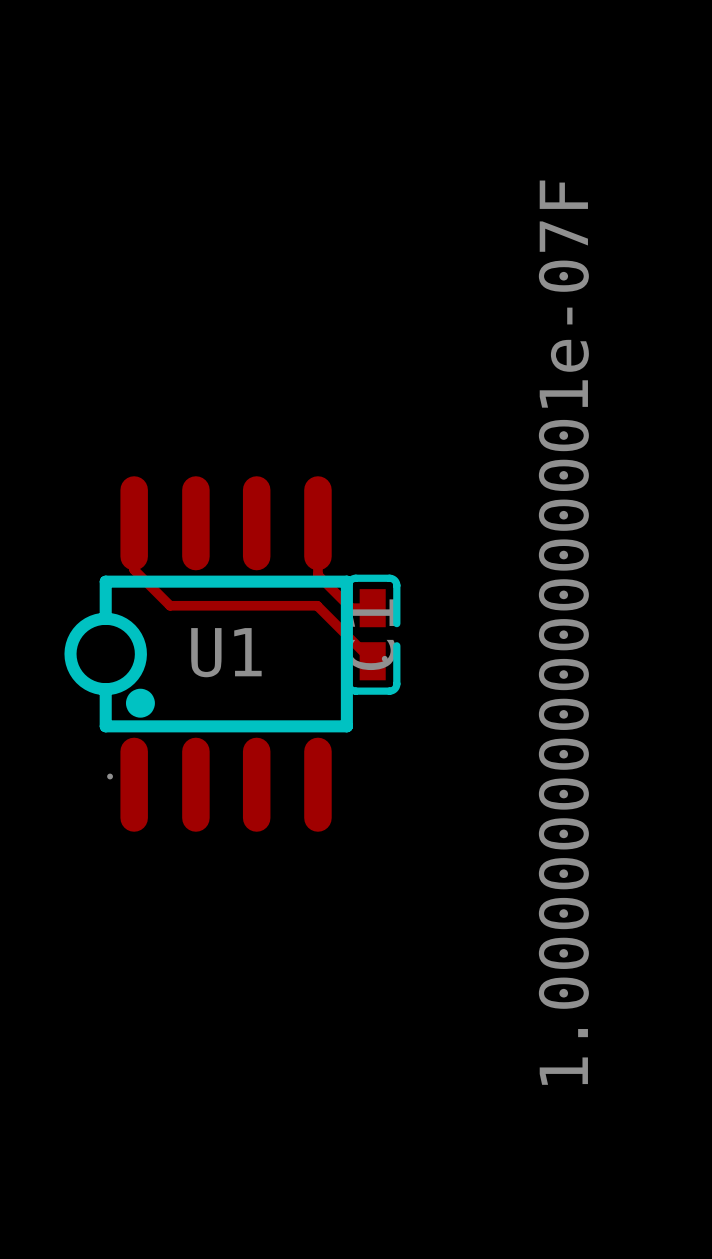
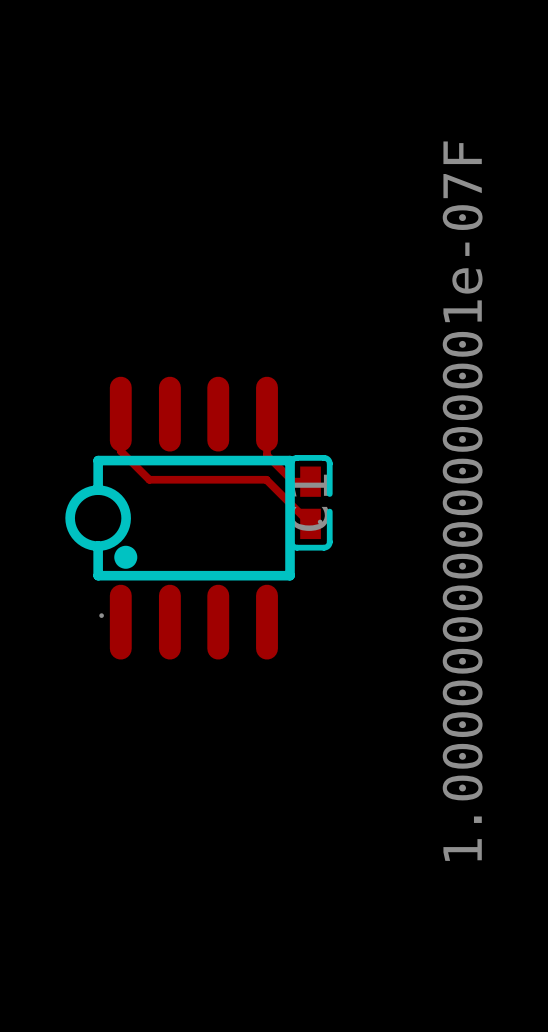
U1 name: U1 (226, 652) -> none

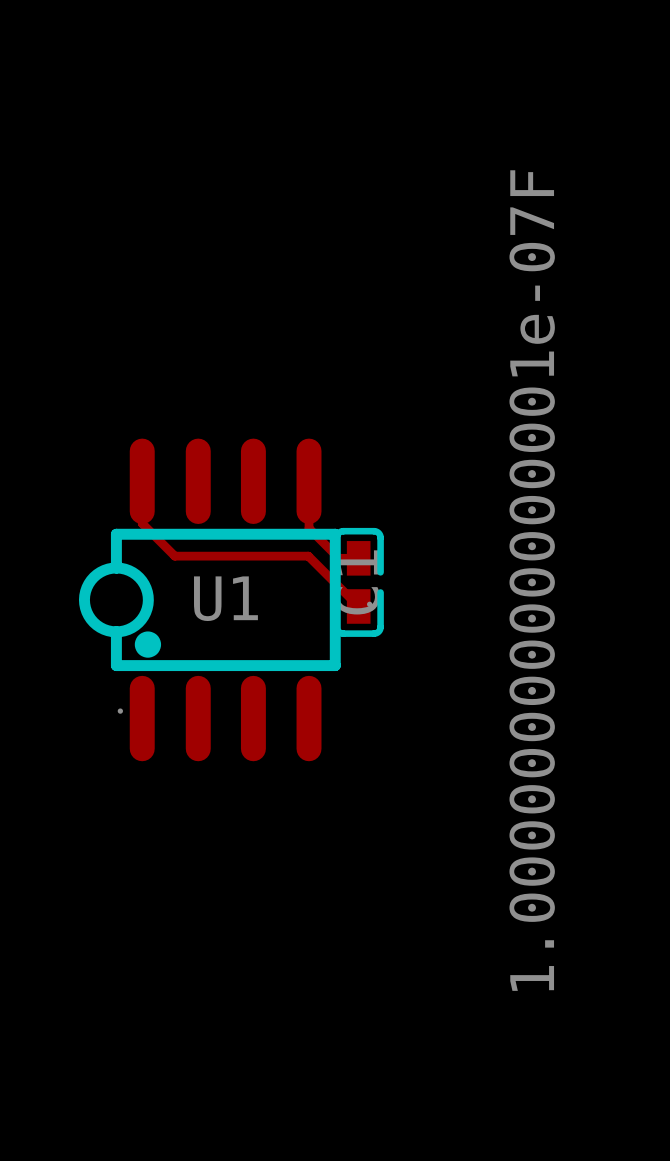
U1 name: none -> U1 (225, 598)

